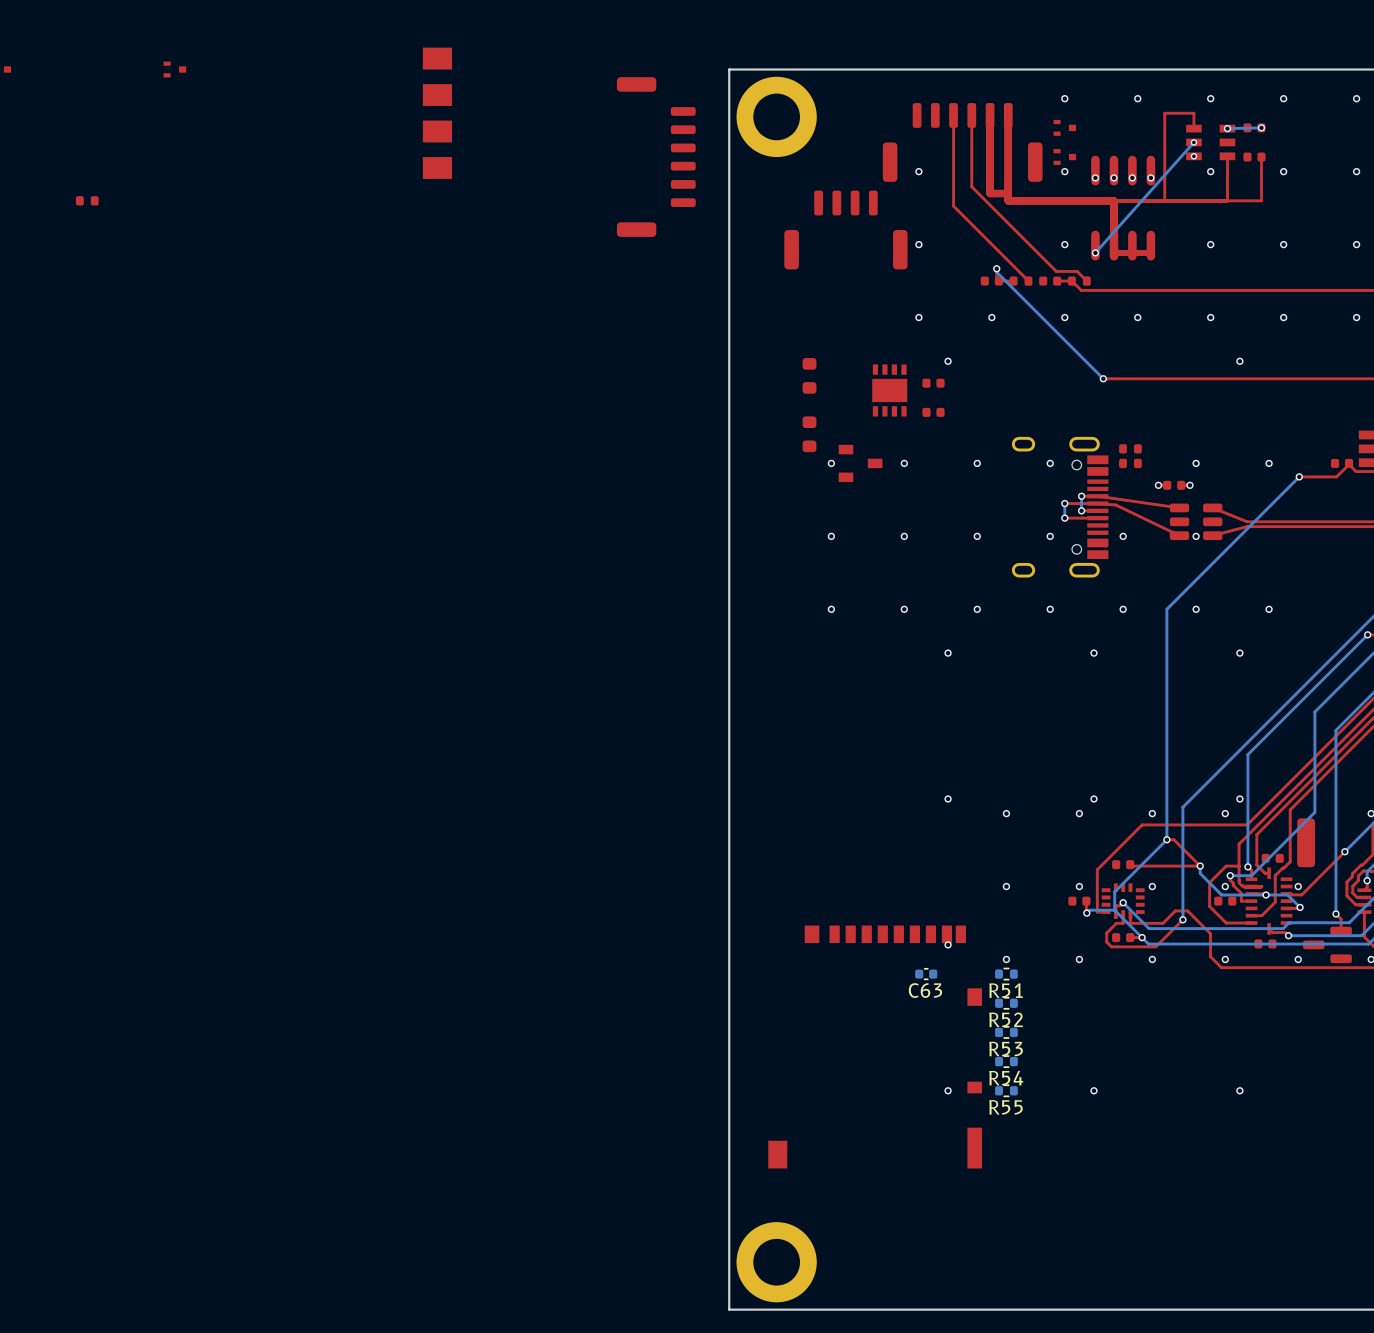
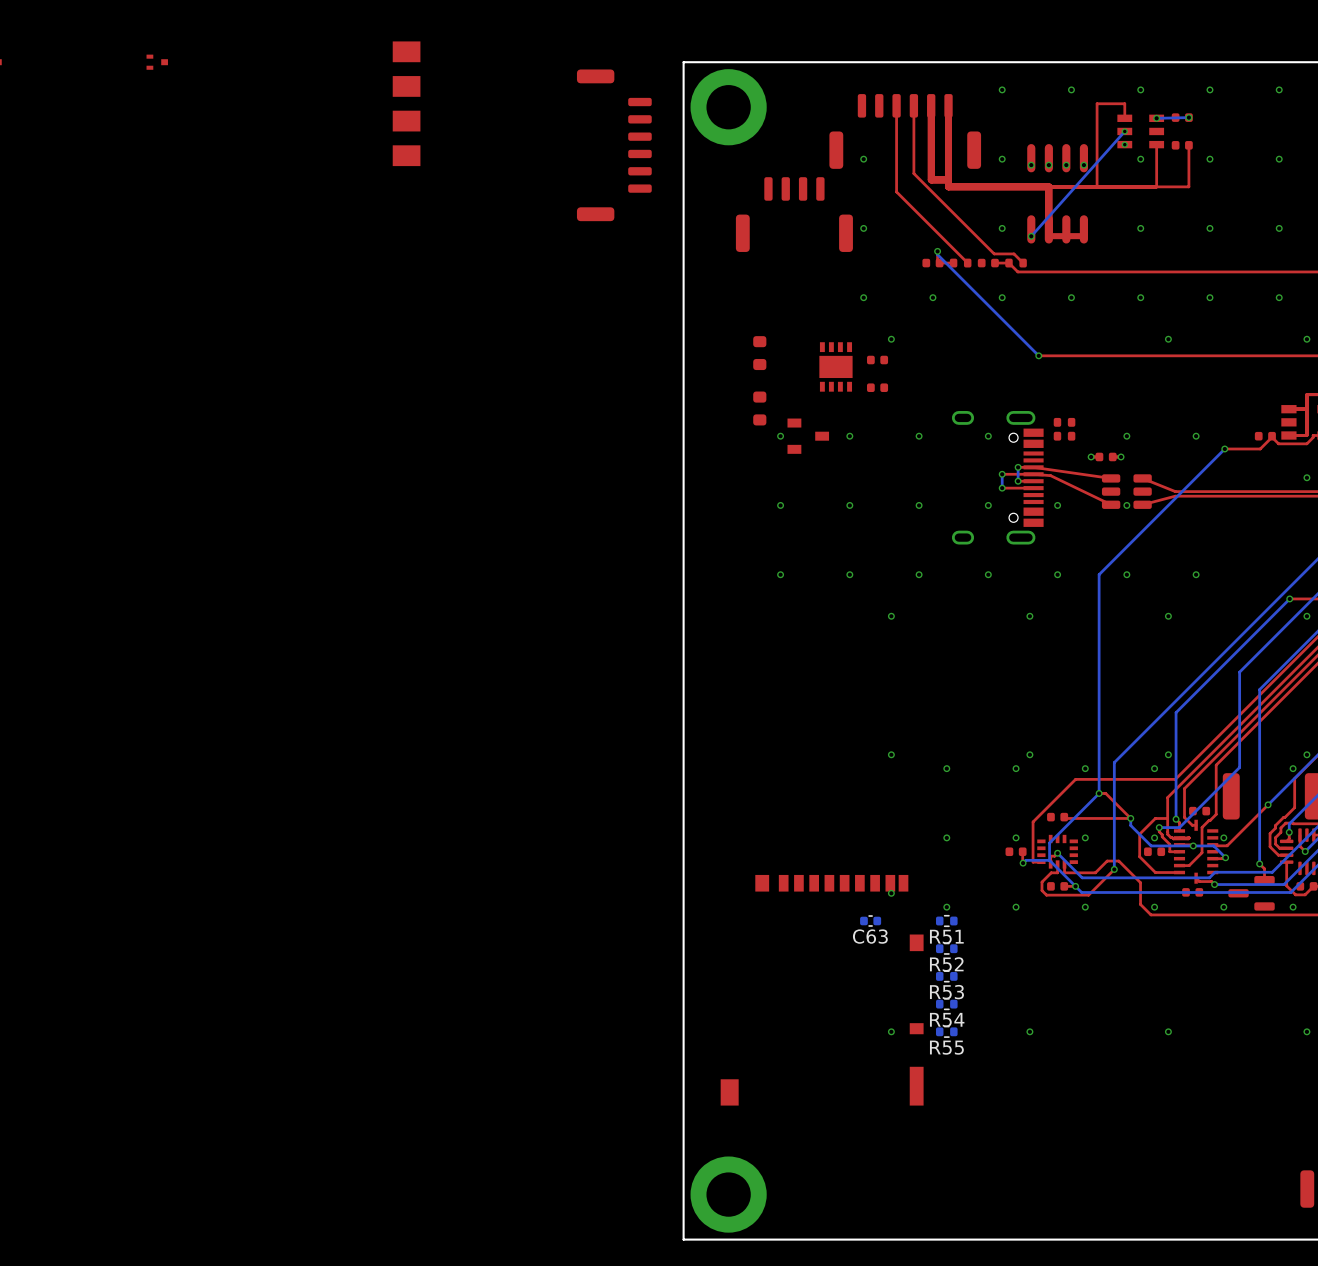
part: (1064, 127) -> none
part: (1064, 157) -> none
part: (87, 200) -> none

